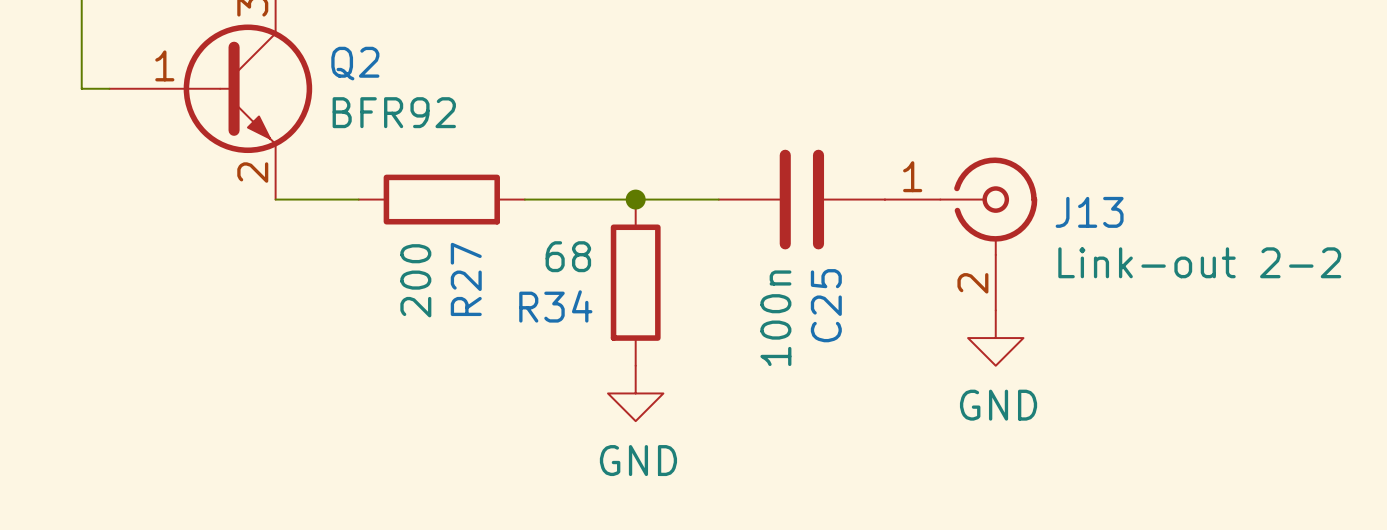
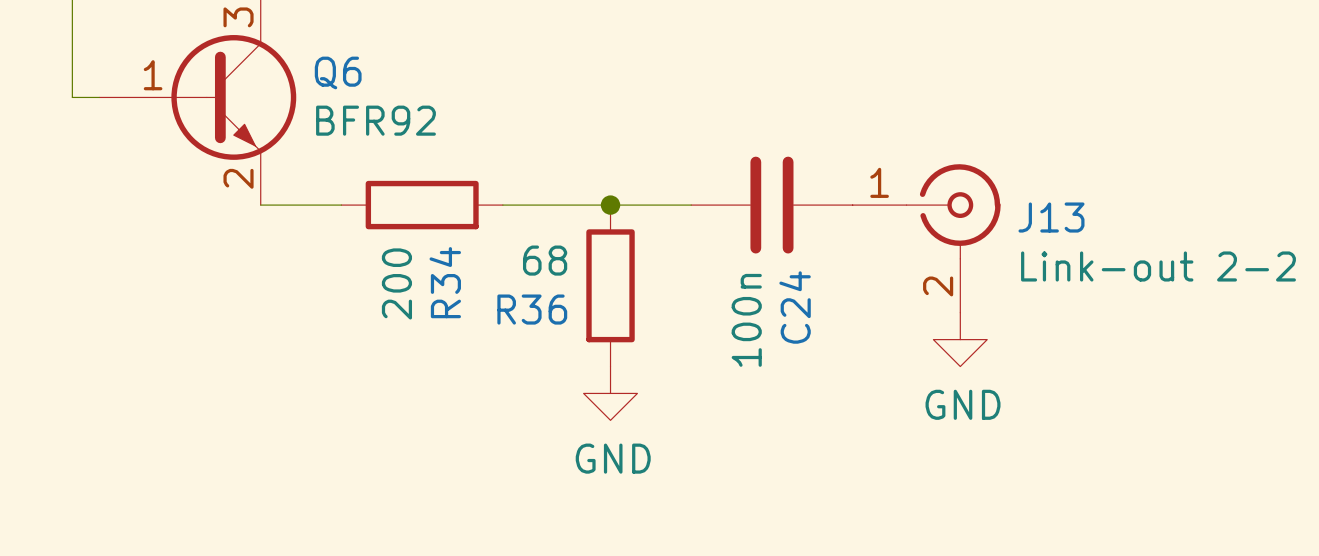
Q2 name: Q2 (355, 63) -> Q6 (338, 72)
R27 name: R27 (466, 279) -> R34 (445, 282)
C25 name: C25 (826, 305) -> C24 (795, 307)
R34 name: R34 (555, 306) -> R36 (532, 309)

